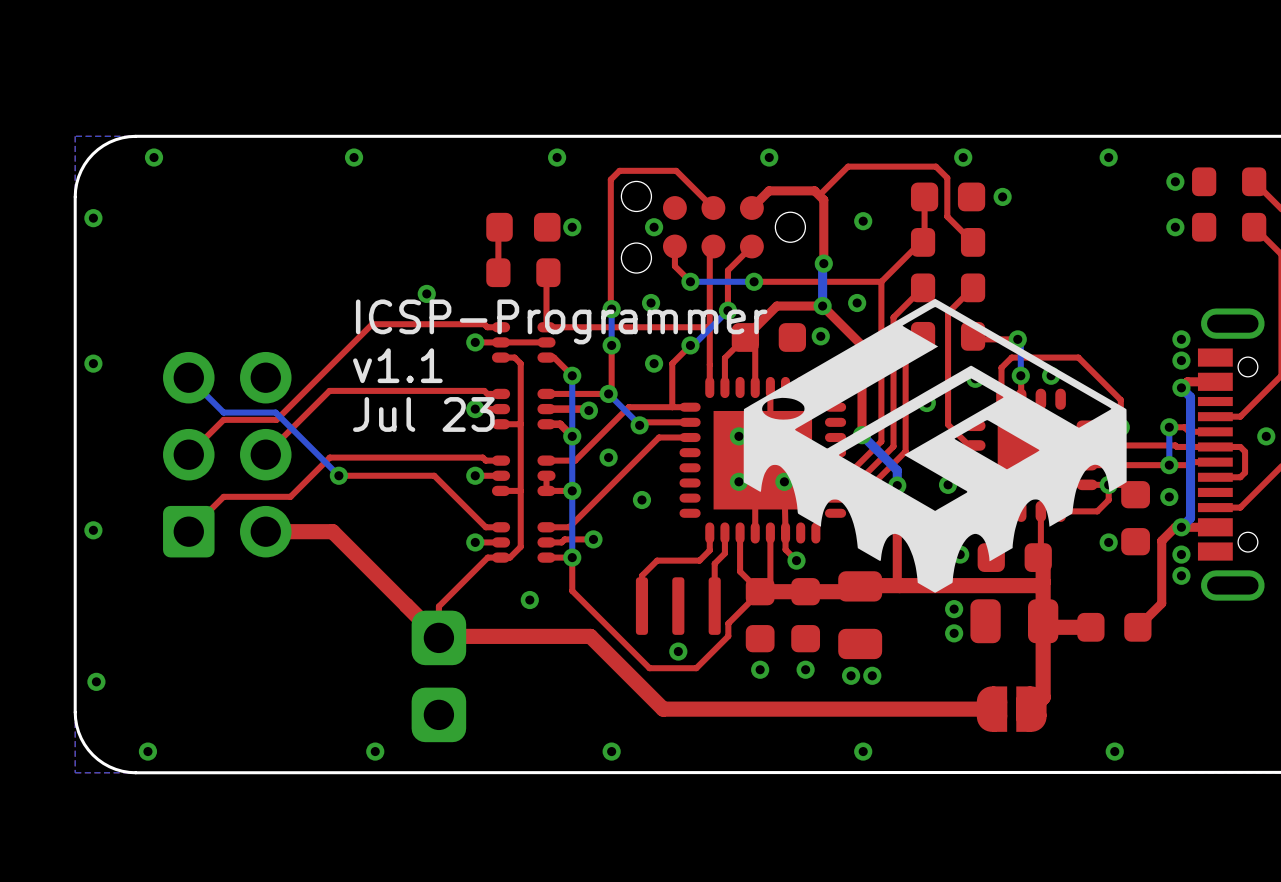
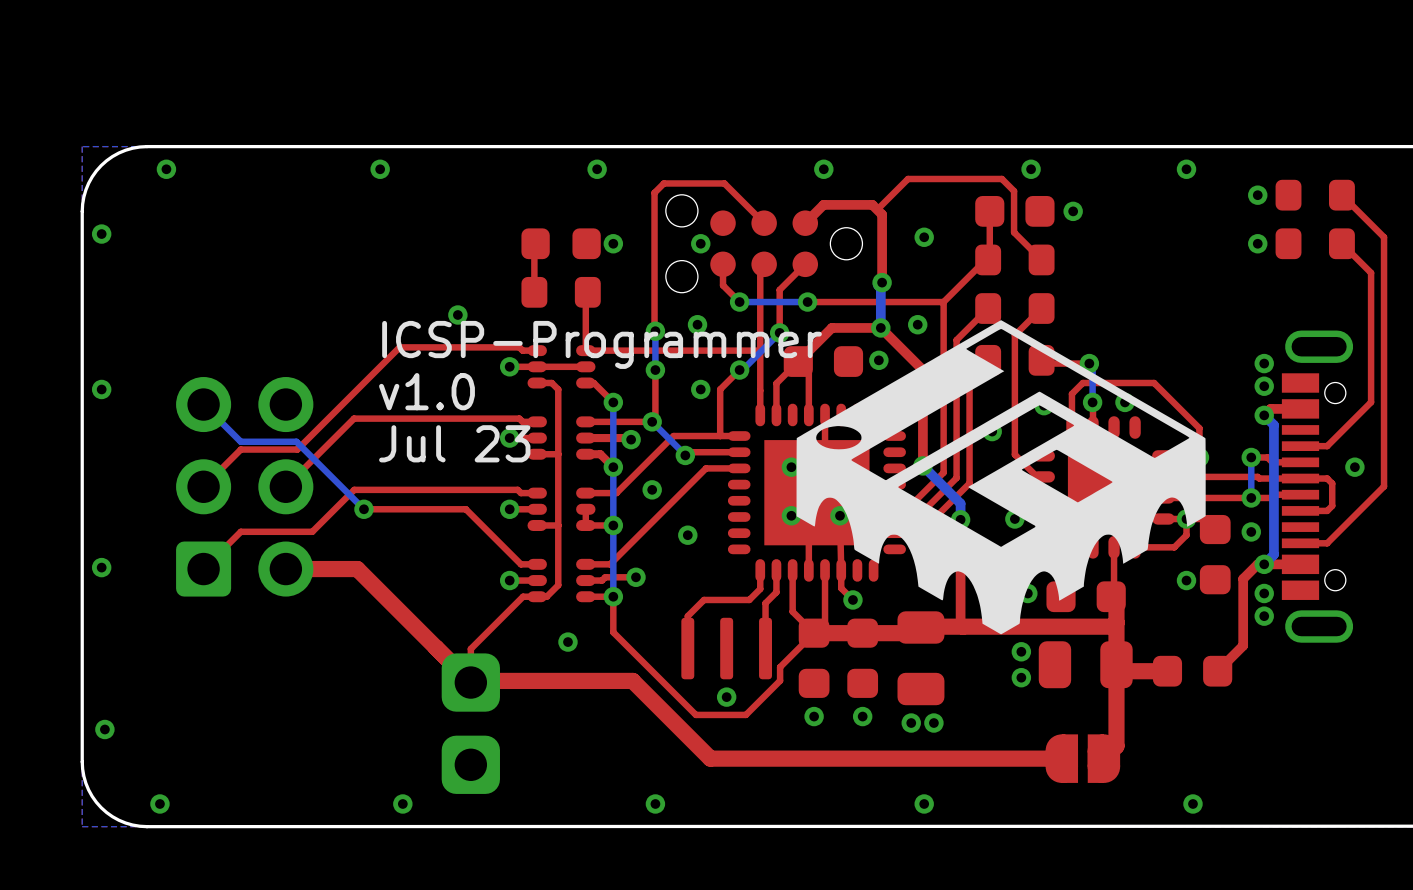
text: v1.1 (397, 365) -> v1.0 (427, 391)

